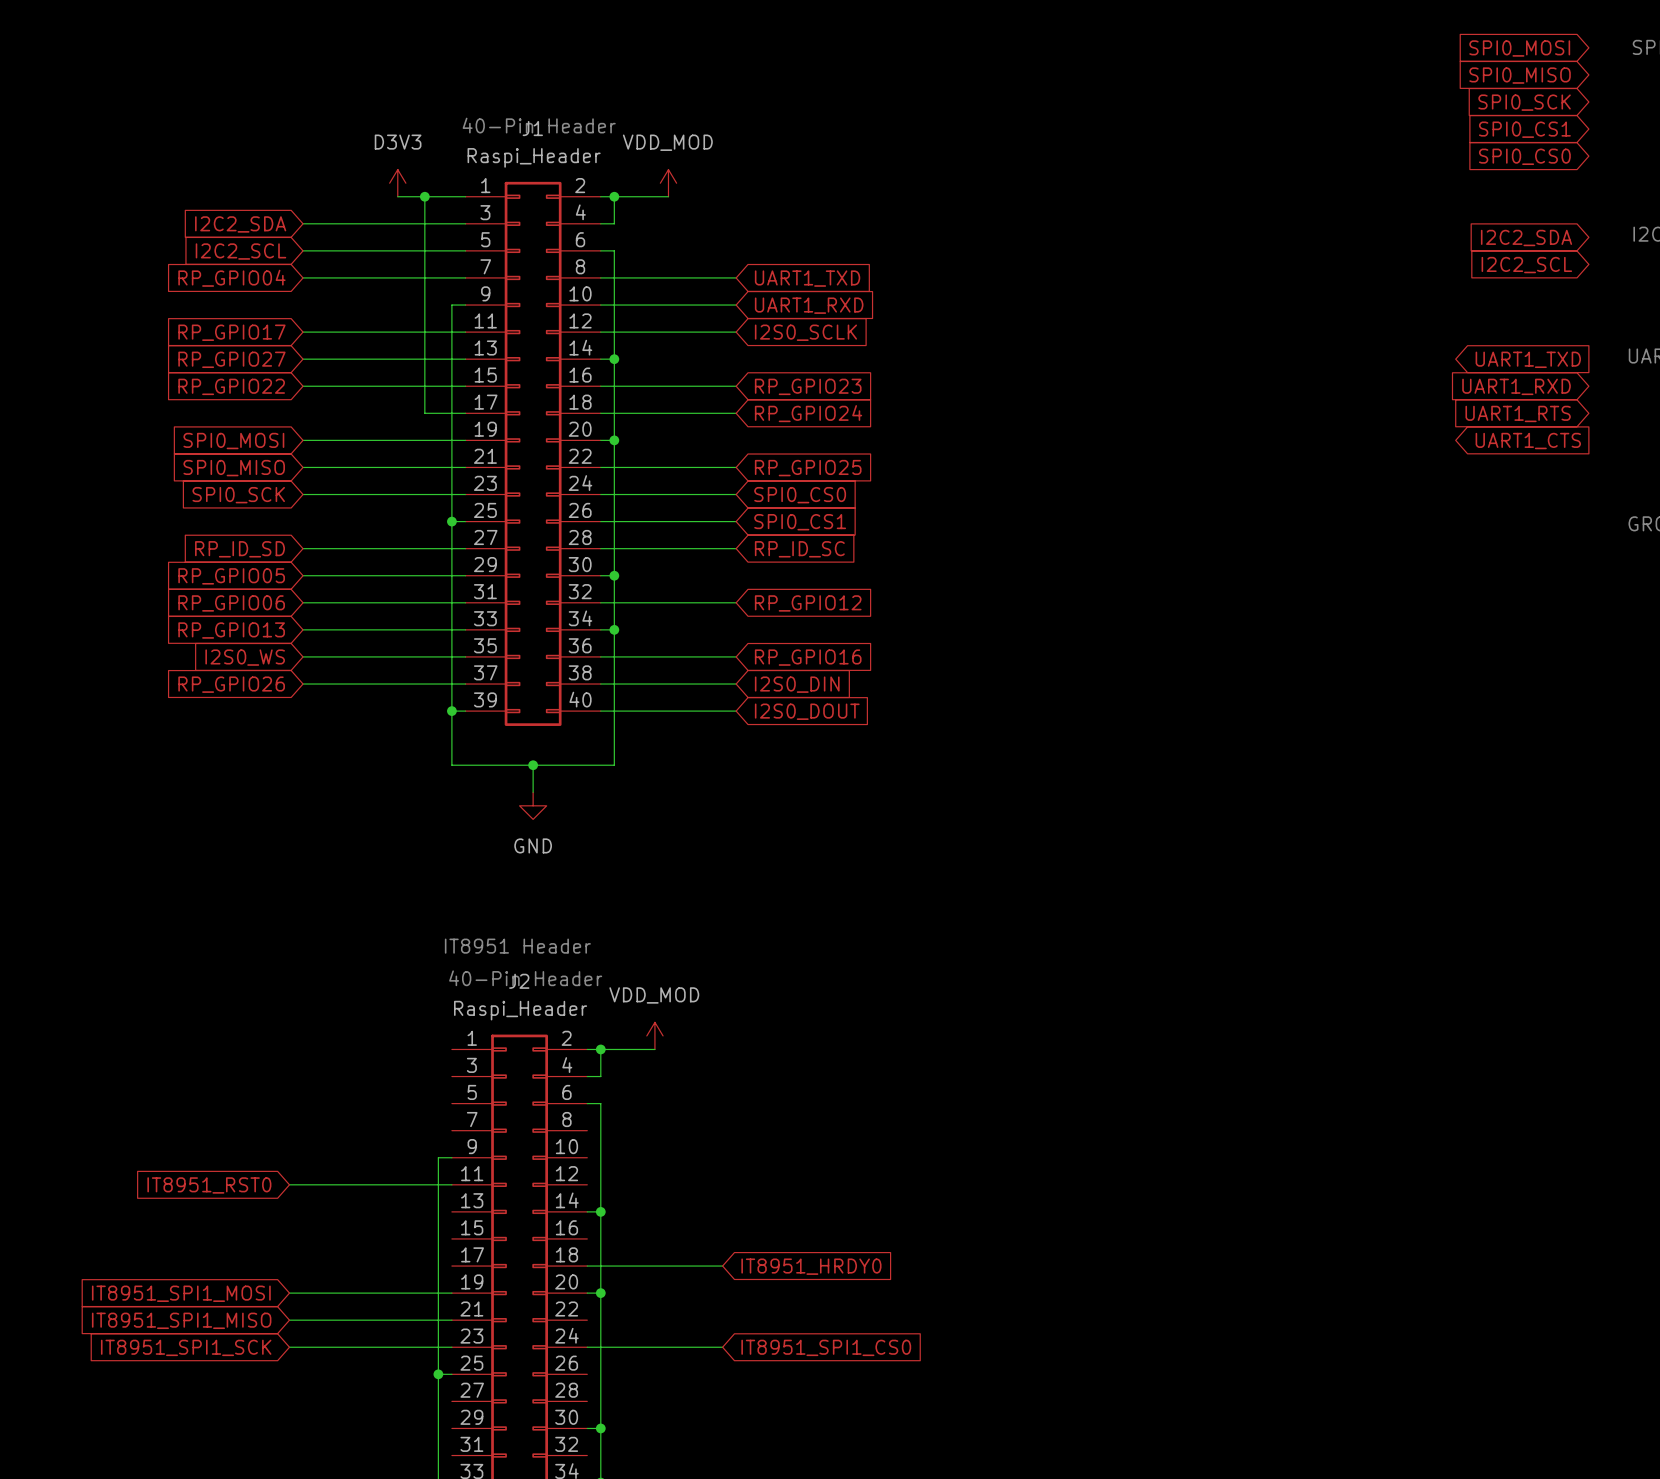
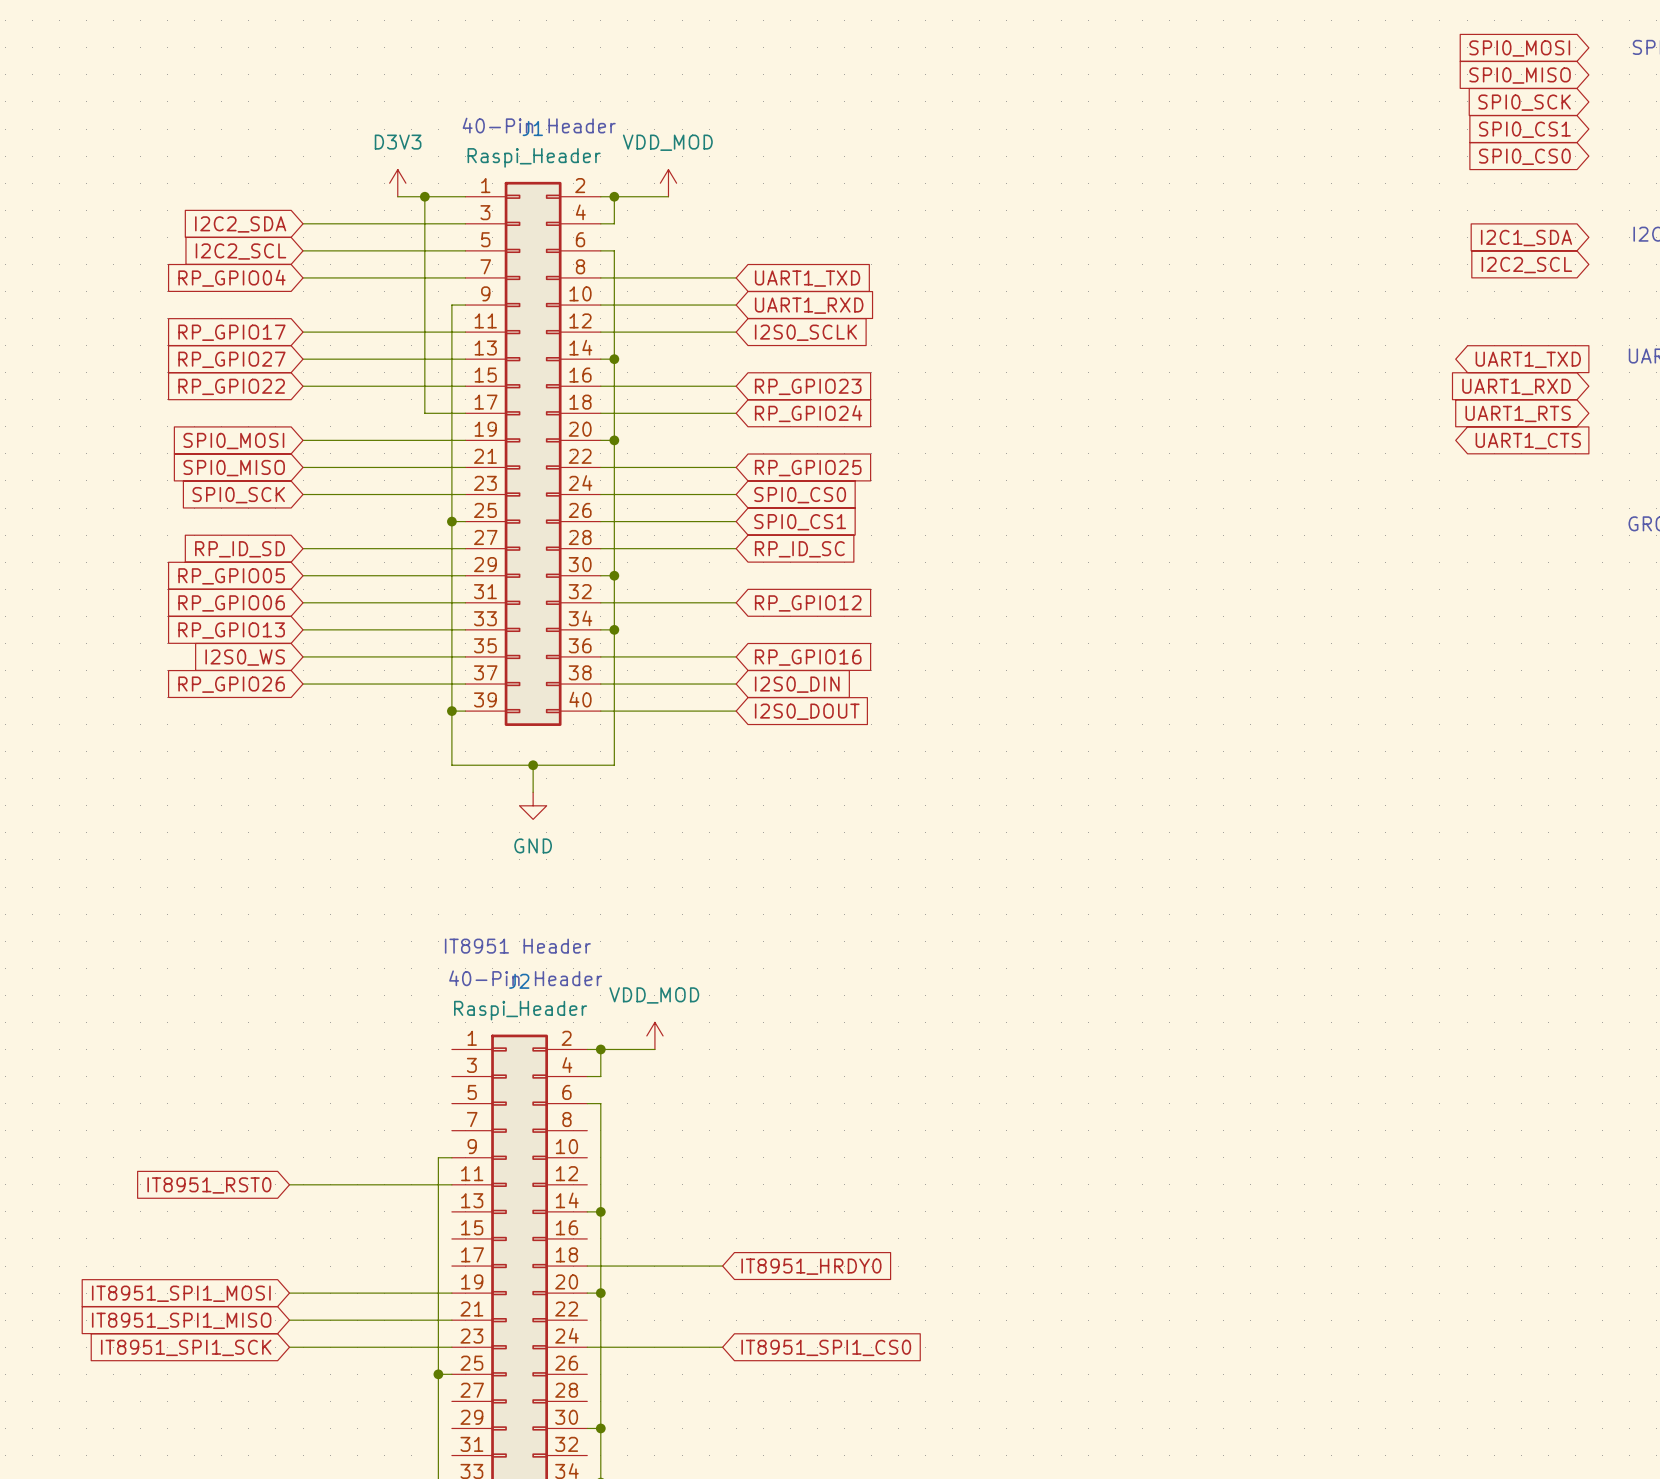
global label: I2C2_SDA (1526, 237) -> I2C1_SDA (1526, 237)

